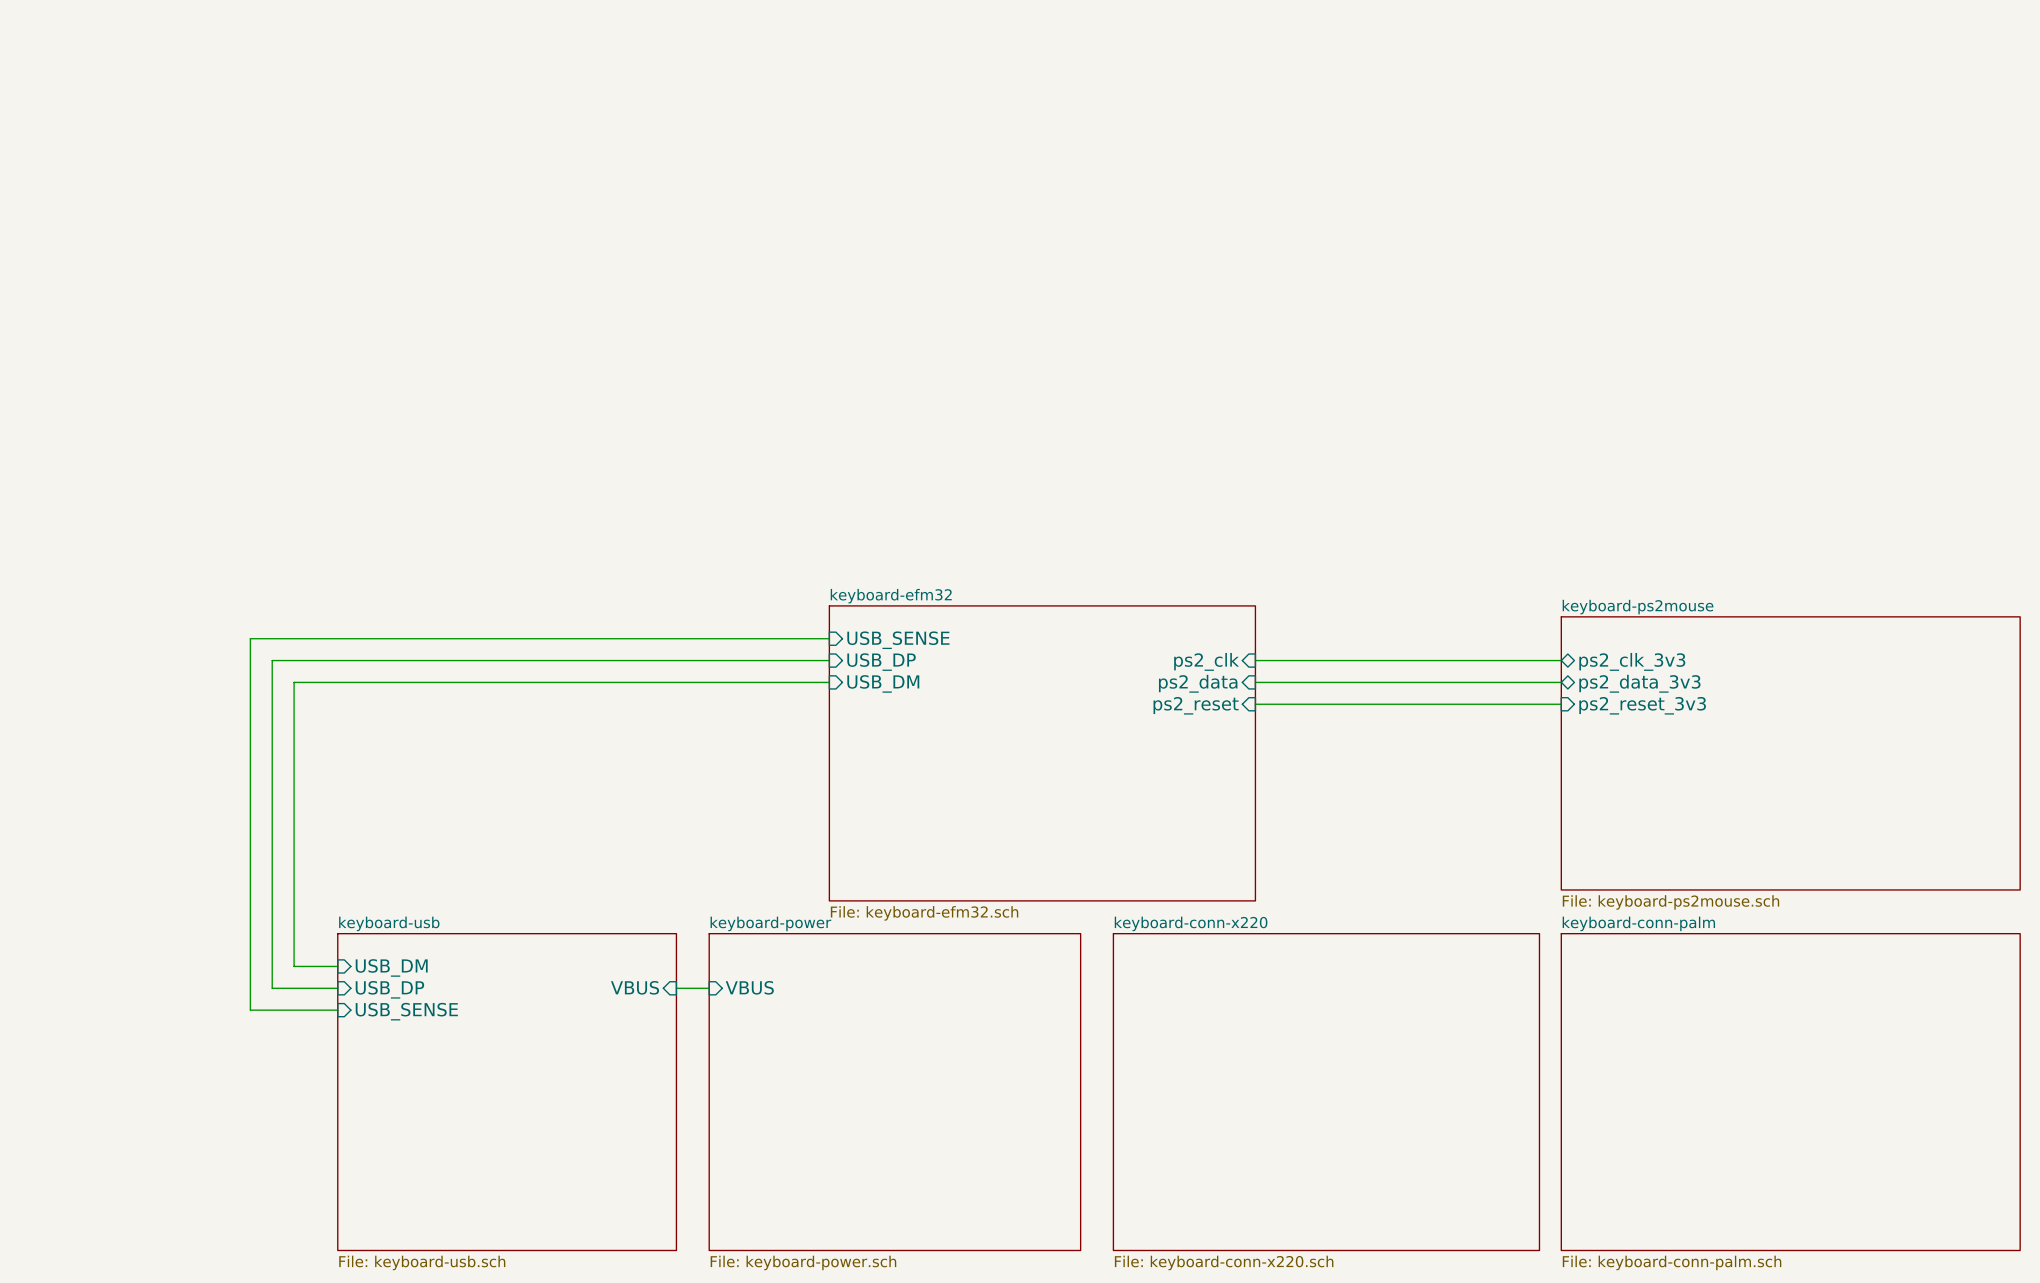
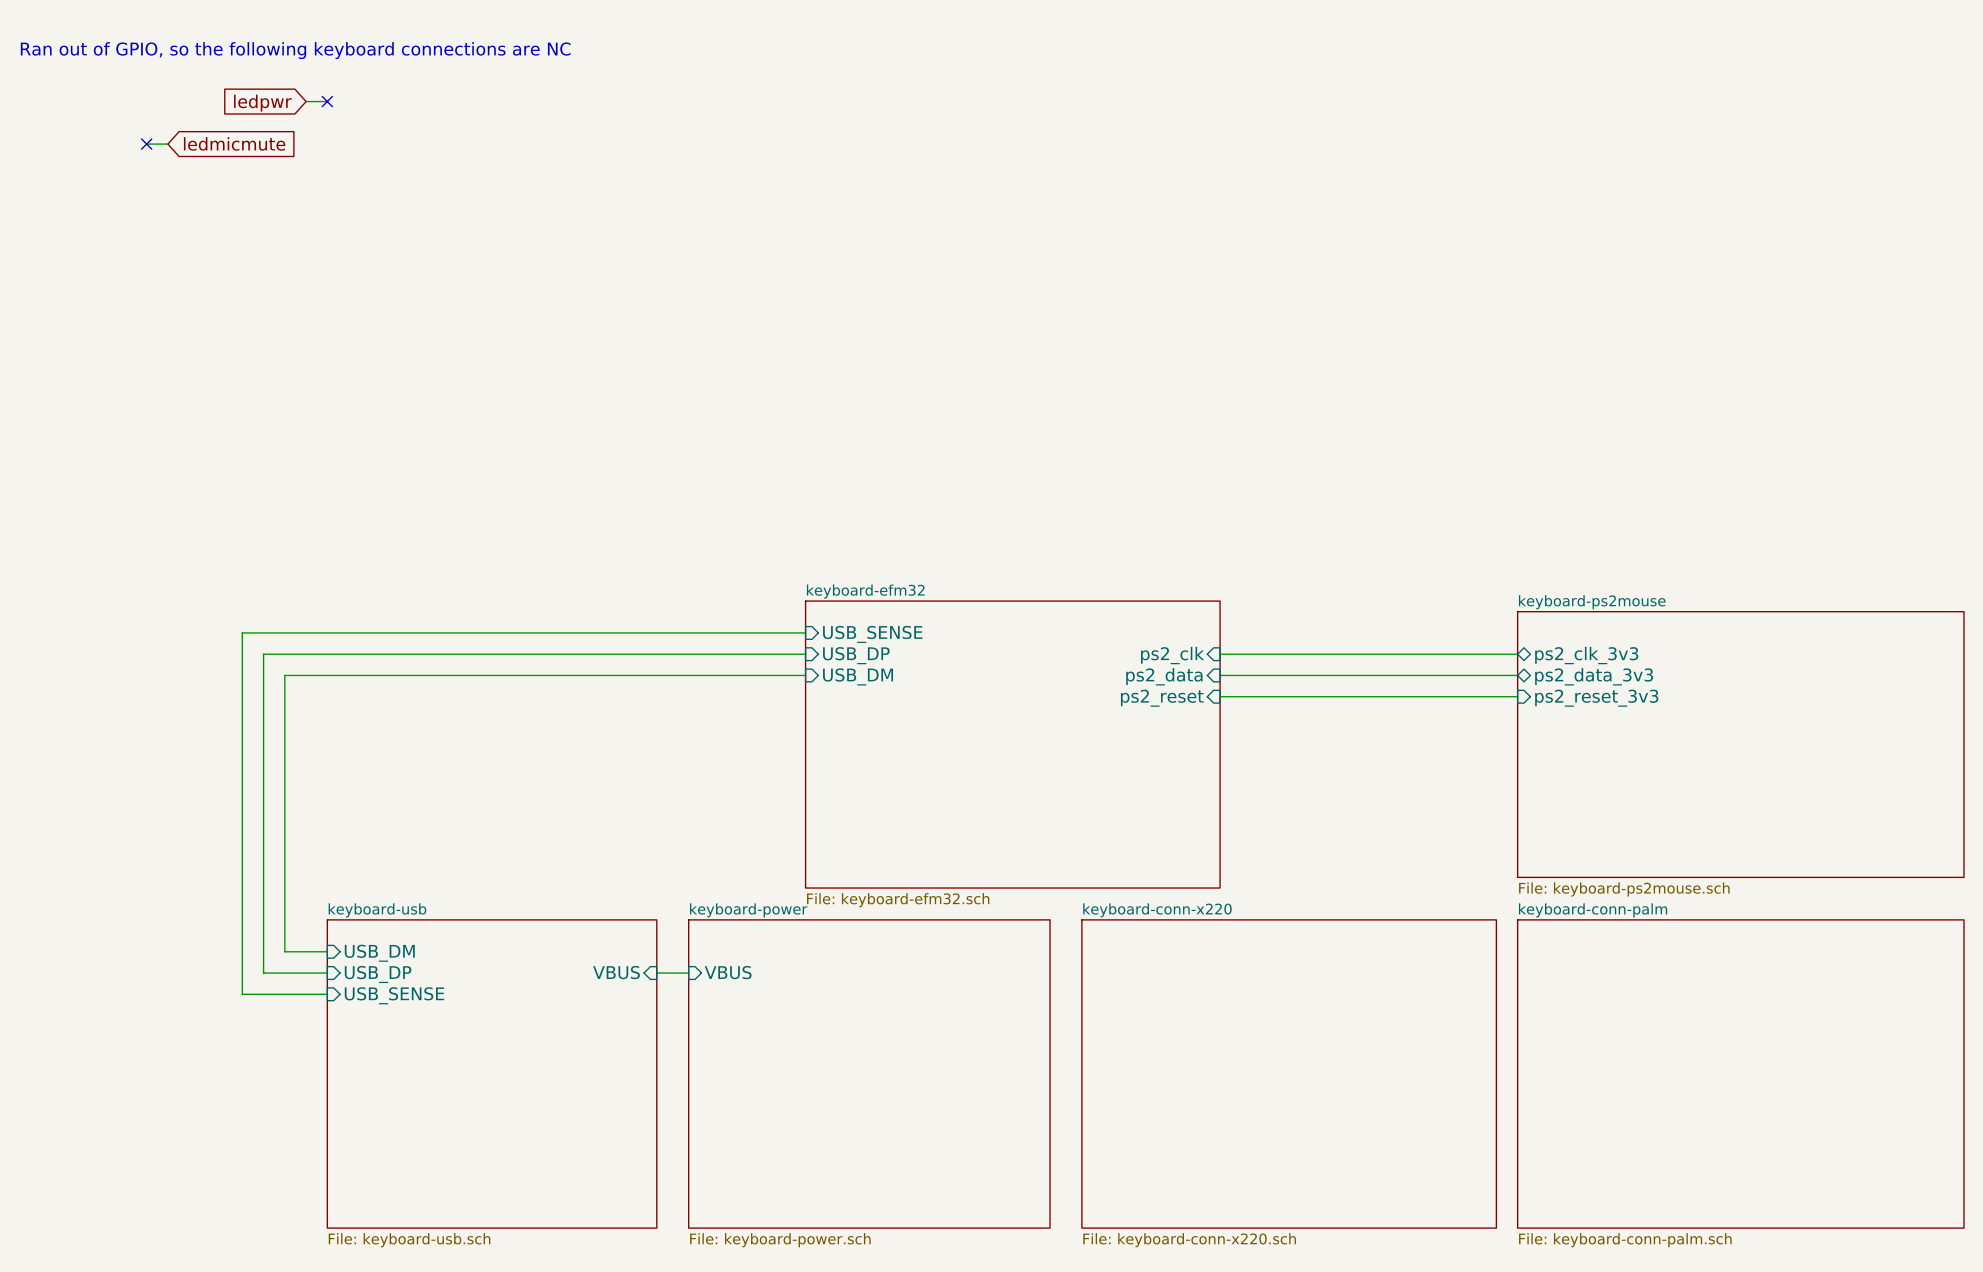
text: none -> Ran out of GPIO, so the following keyboard connections are NC (295, 50)
wire: none -> (306, 101) (327, 101)
no-connect mark: none -> (327, 101)
global label: none -> ledpwr (262, 103)
wire: none -> (146, 144) (167, 144)
no-connect mark: none -> (146, 144)
global label: none -> ledmicmute (234, 143)

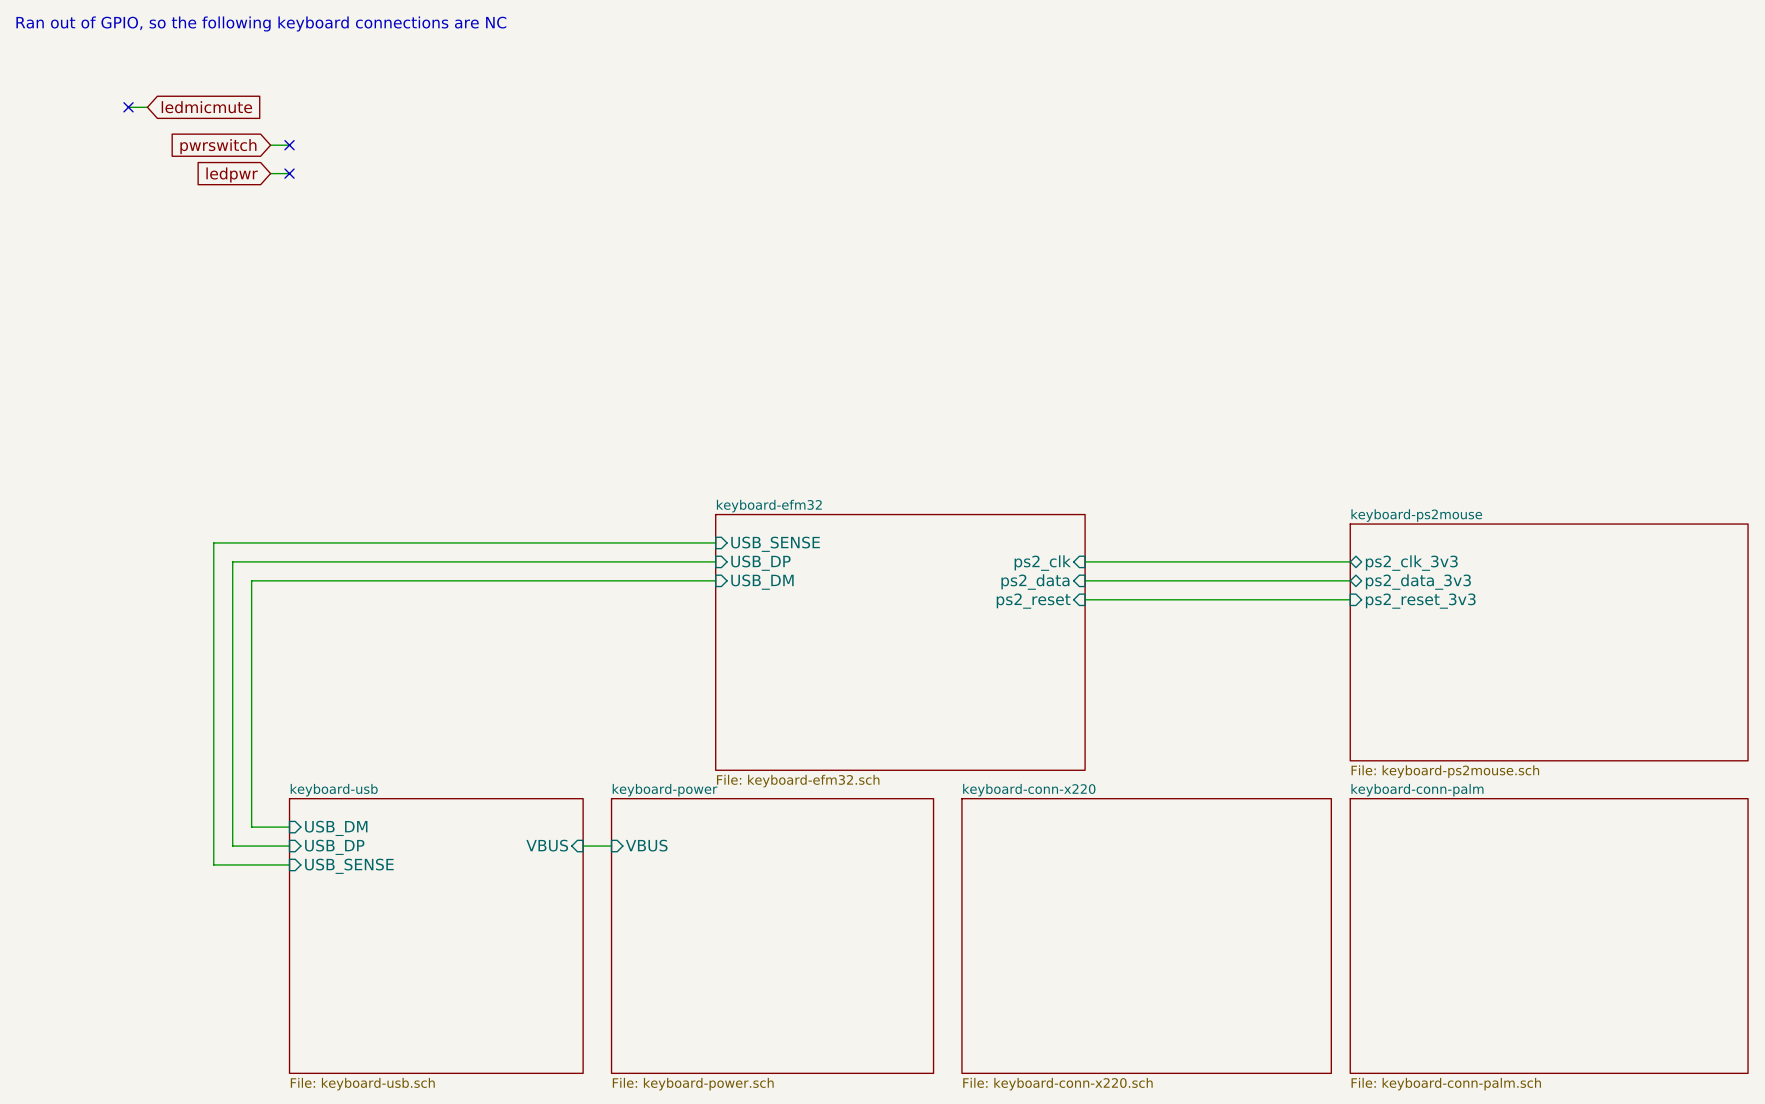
wire: (306, 101) (327, 101) -> (270, 145) (289, 145)
no-connect mark: (327, 101) -> none
global label position: ledpwr (262, 103) -> ledpwr (232, 174)
no-connect mark: none -> (289, 145)
global label: none -> pwrswitch (218, 146)
wire: none -> (270, 173) (289, 173)
no-connect mark: none -> (289, 173)

